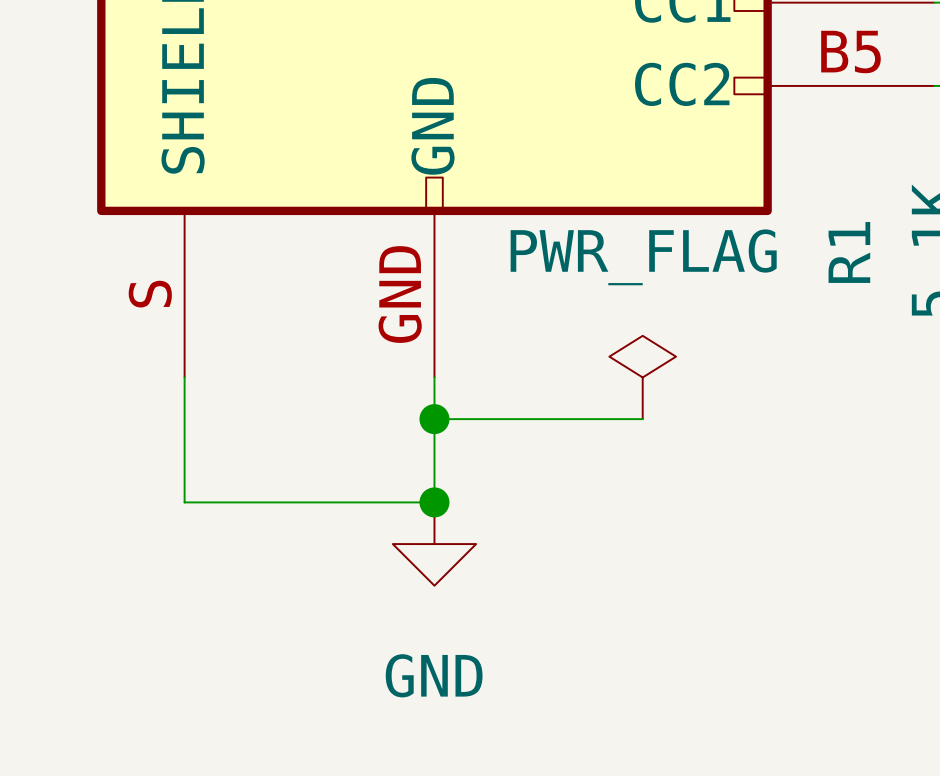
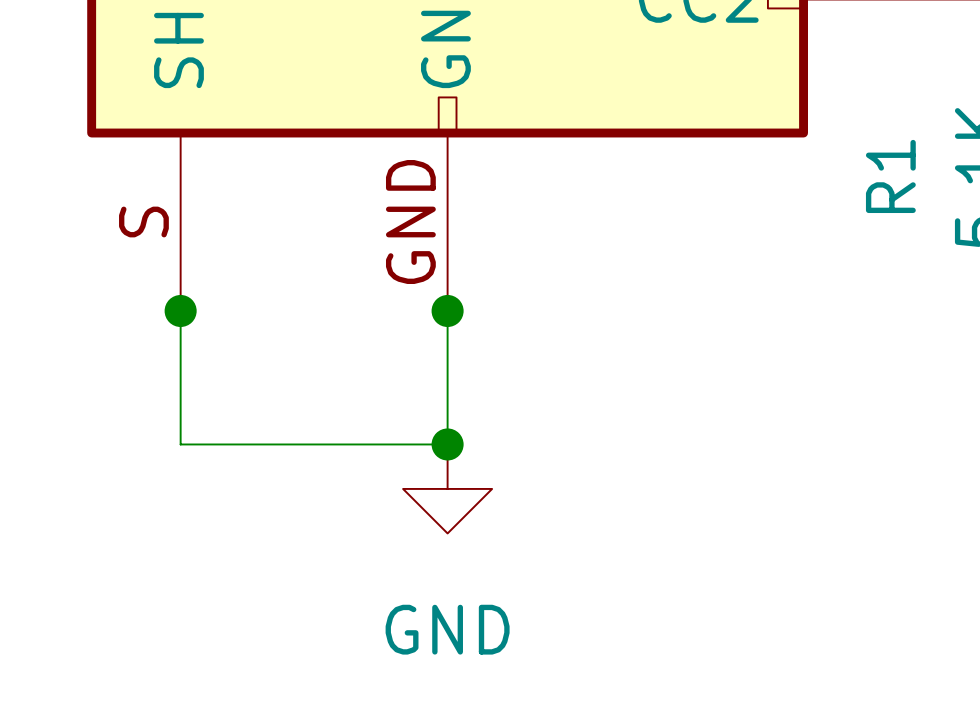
junction: none -> (180, 310)
power symbol: PWR_FLAG (642, 377) -> none
wire: (434, 419) (642, 419) -> none
junction position: (434, 419) -> (447, 310)

